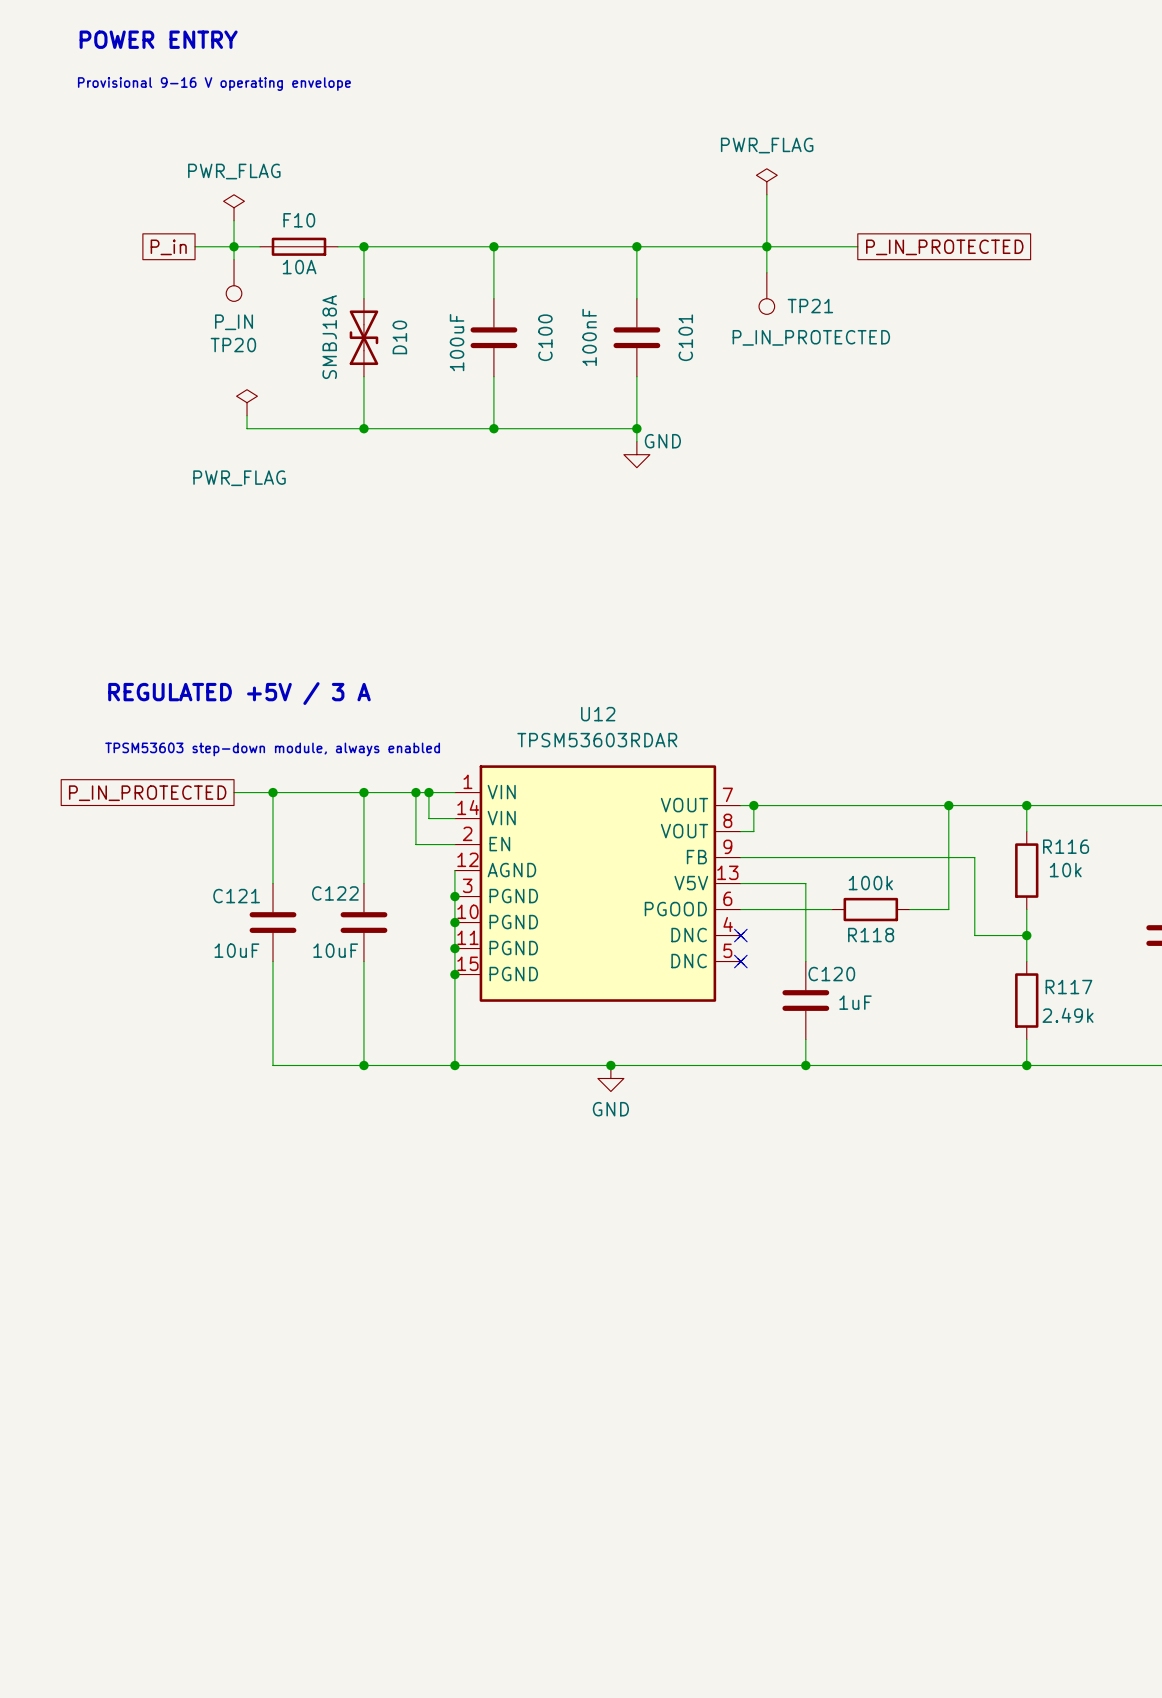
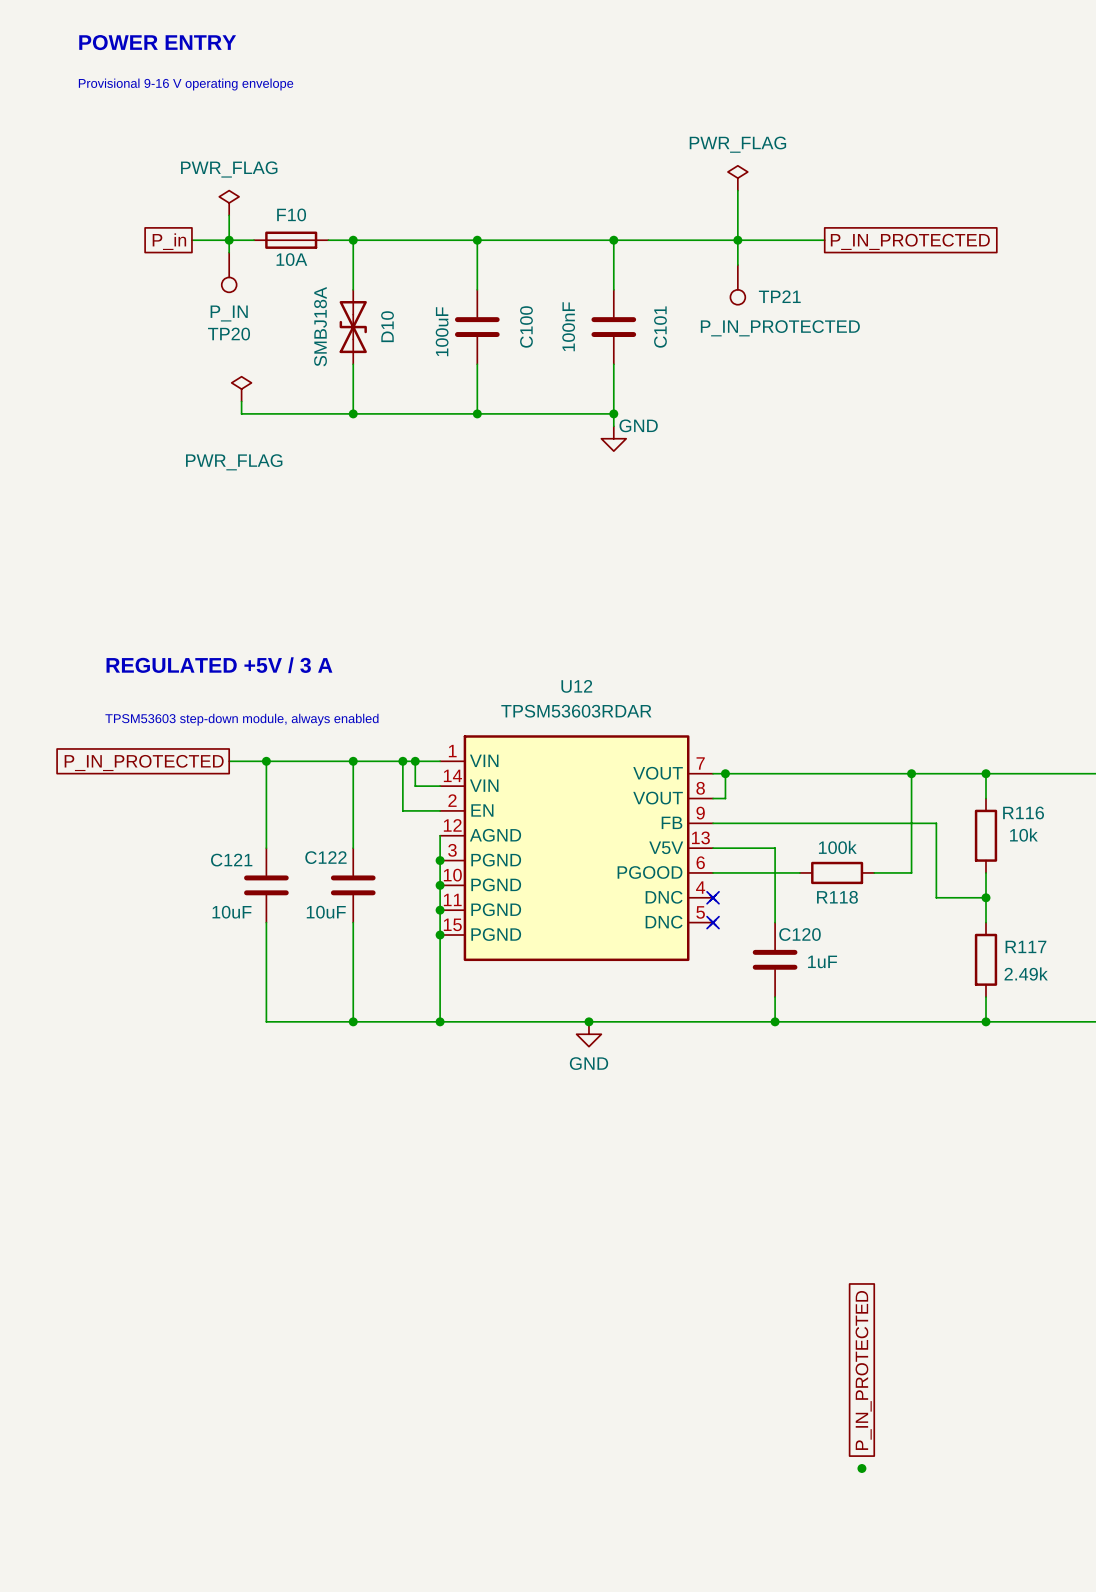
global label: none -> P_IN_PROTECTED (863, 1370)
junction: none -> (861, 1468)

